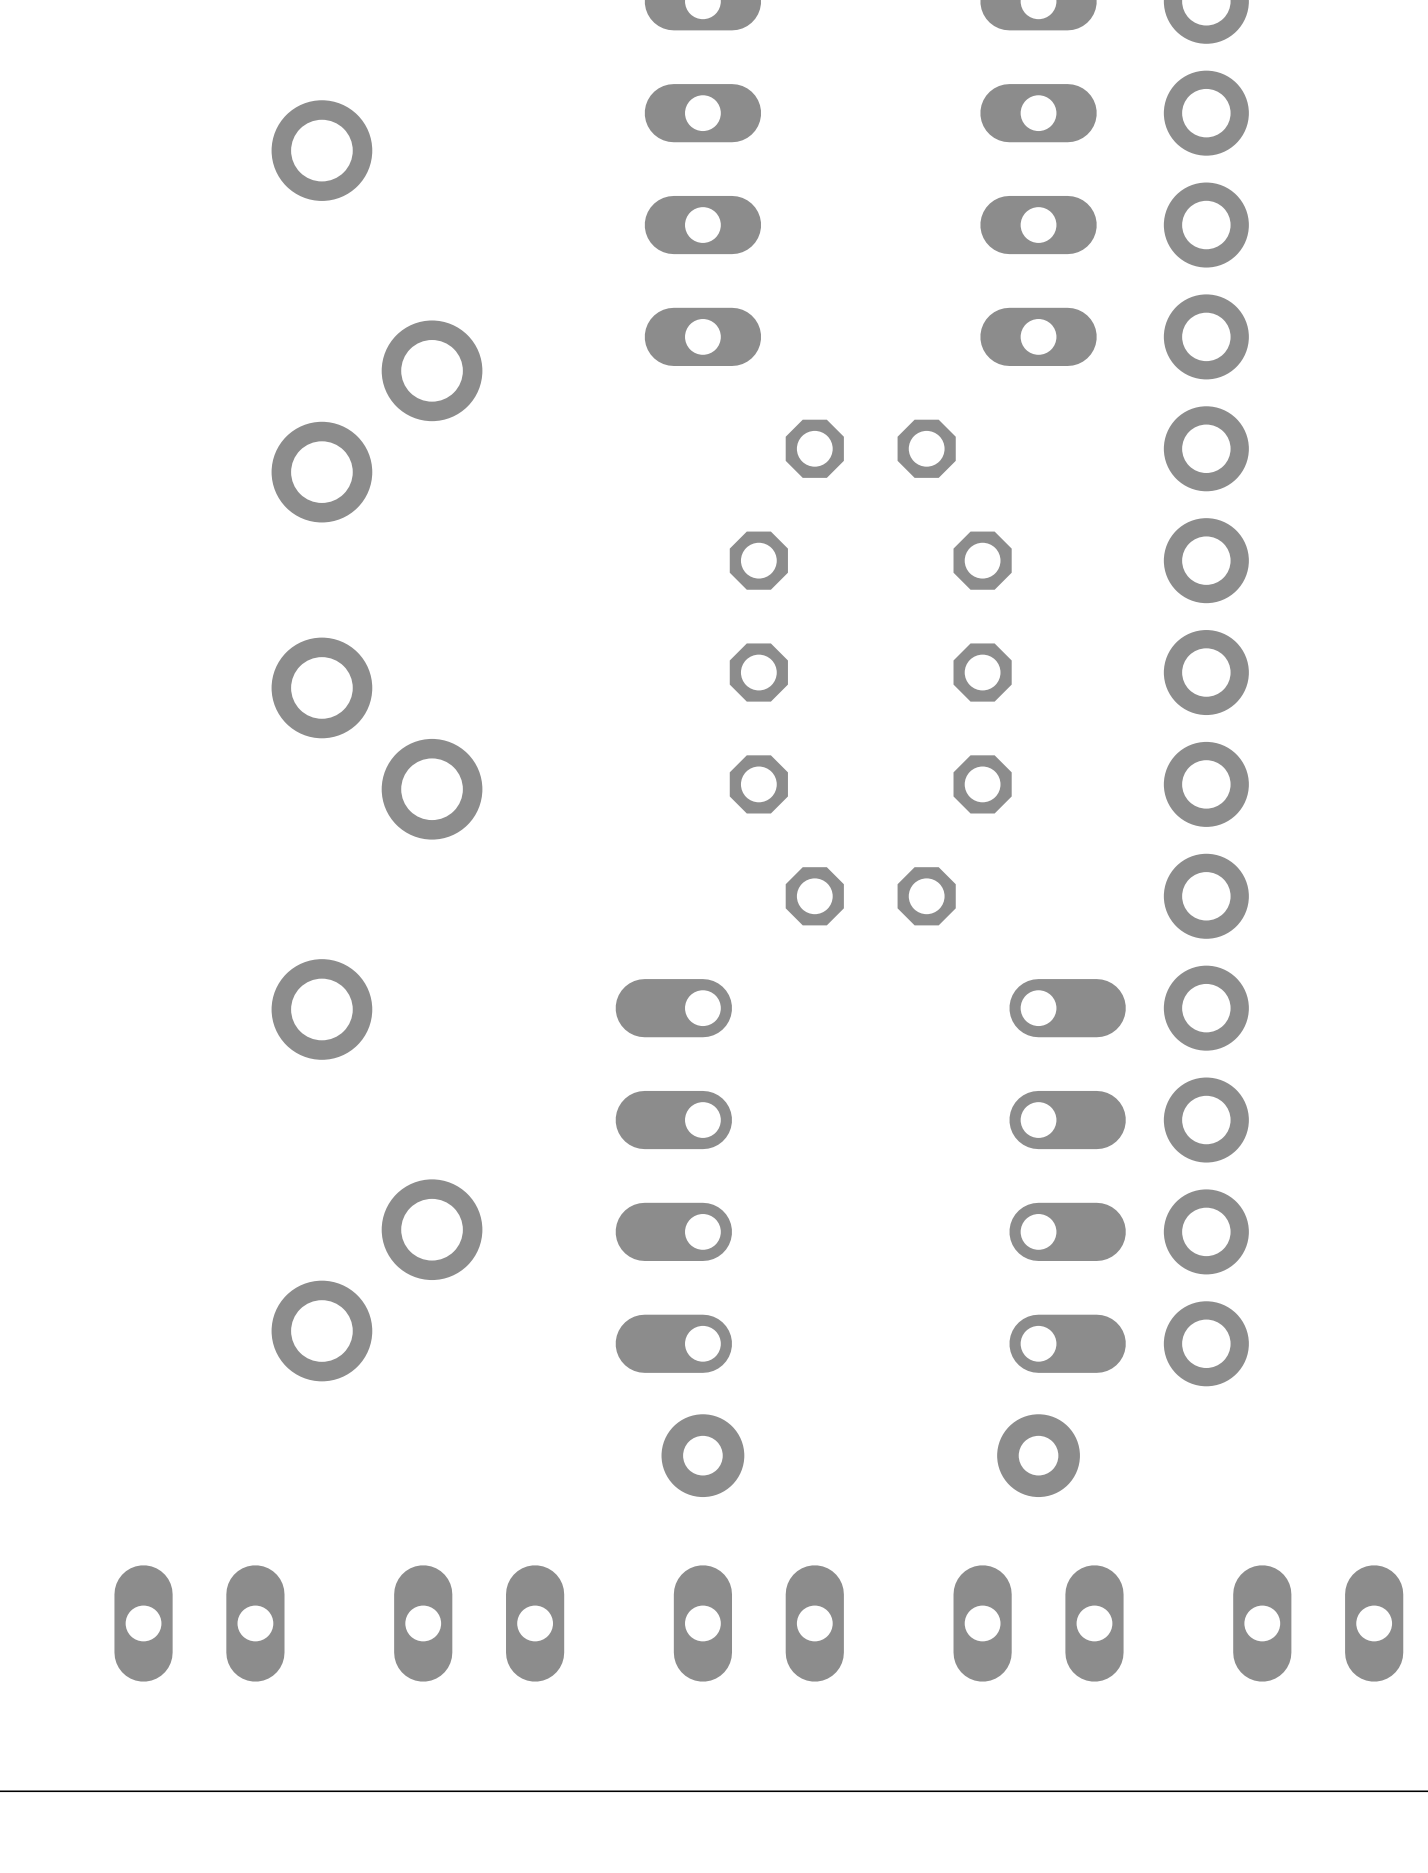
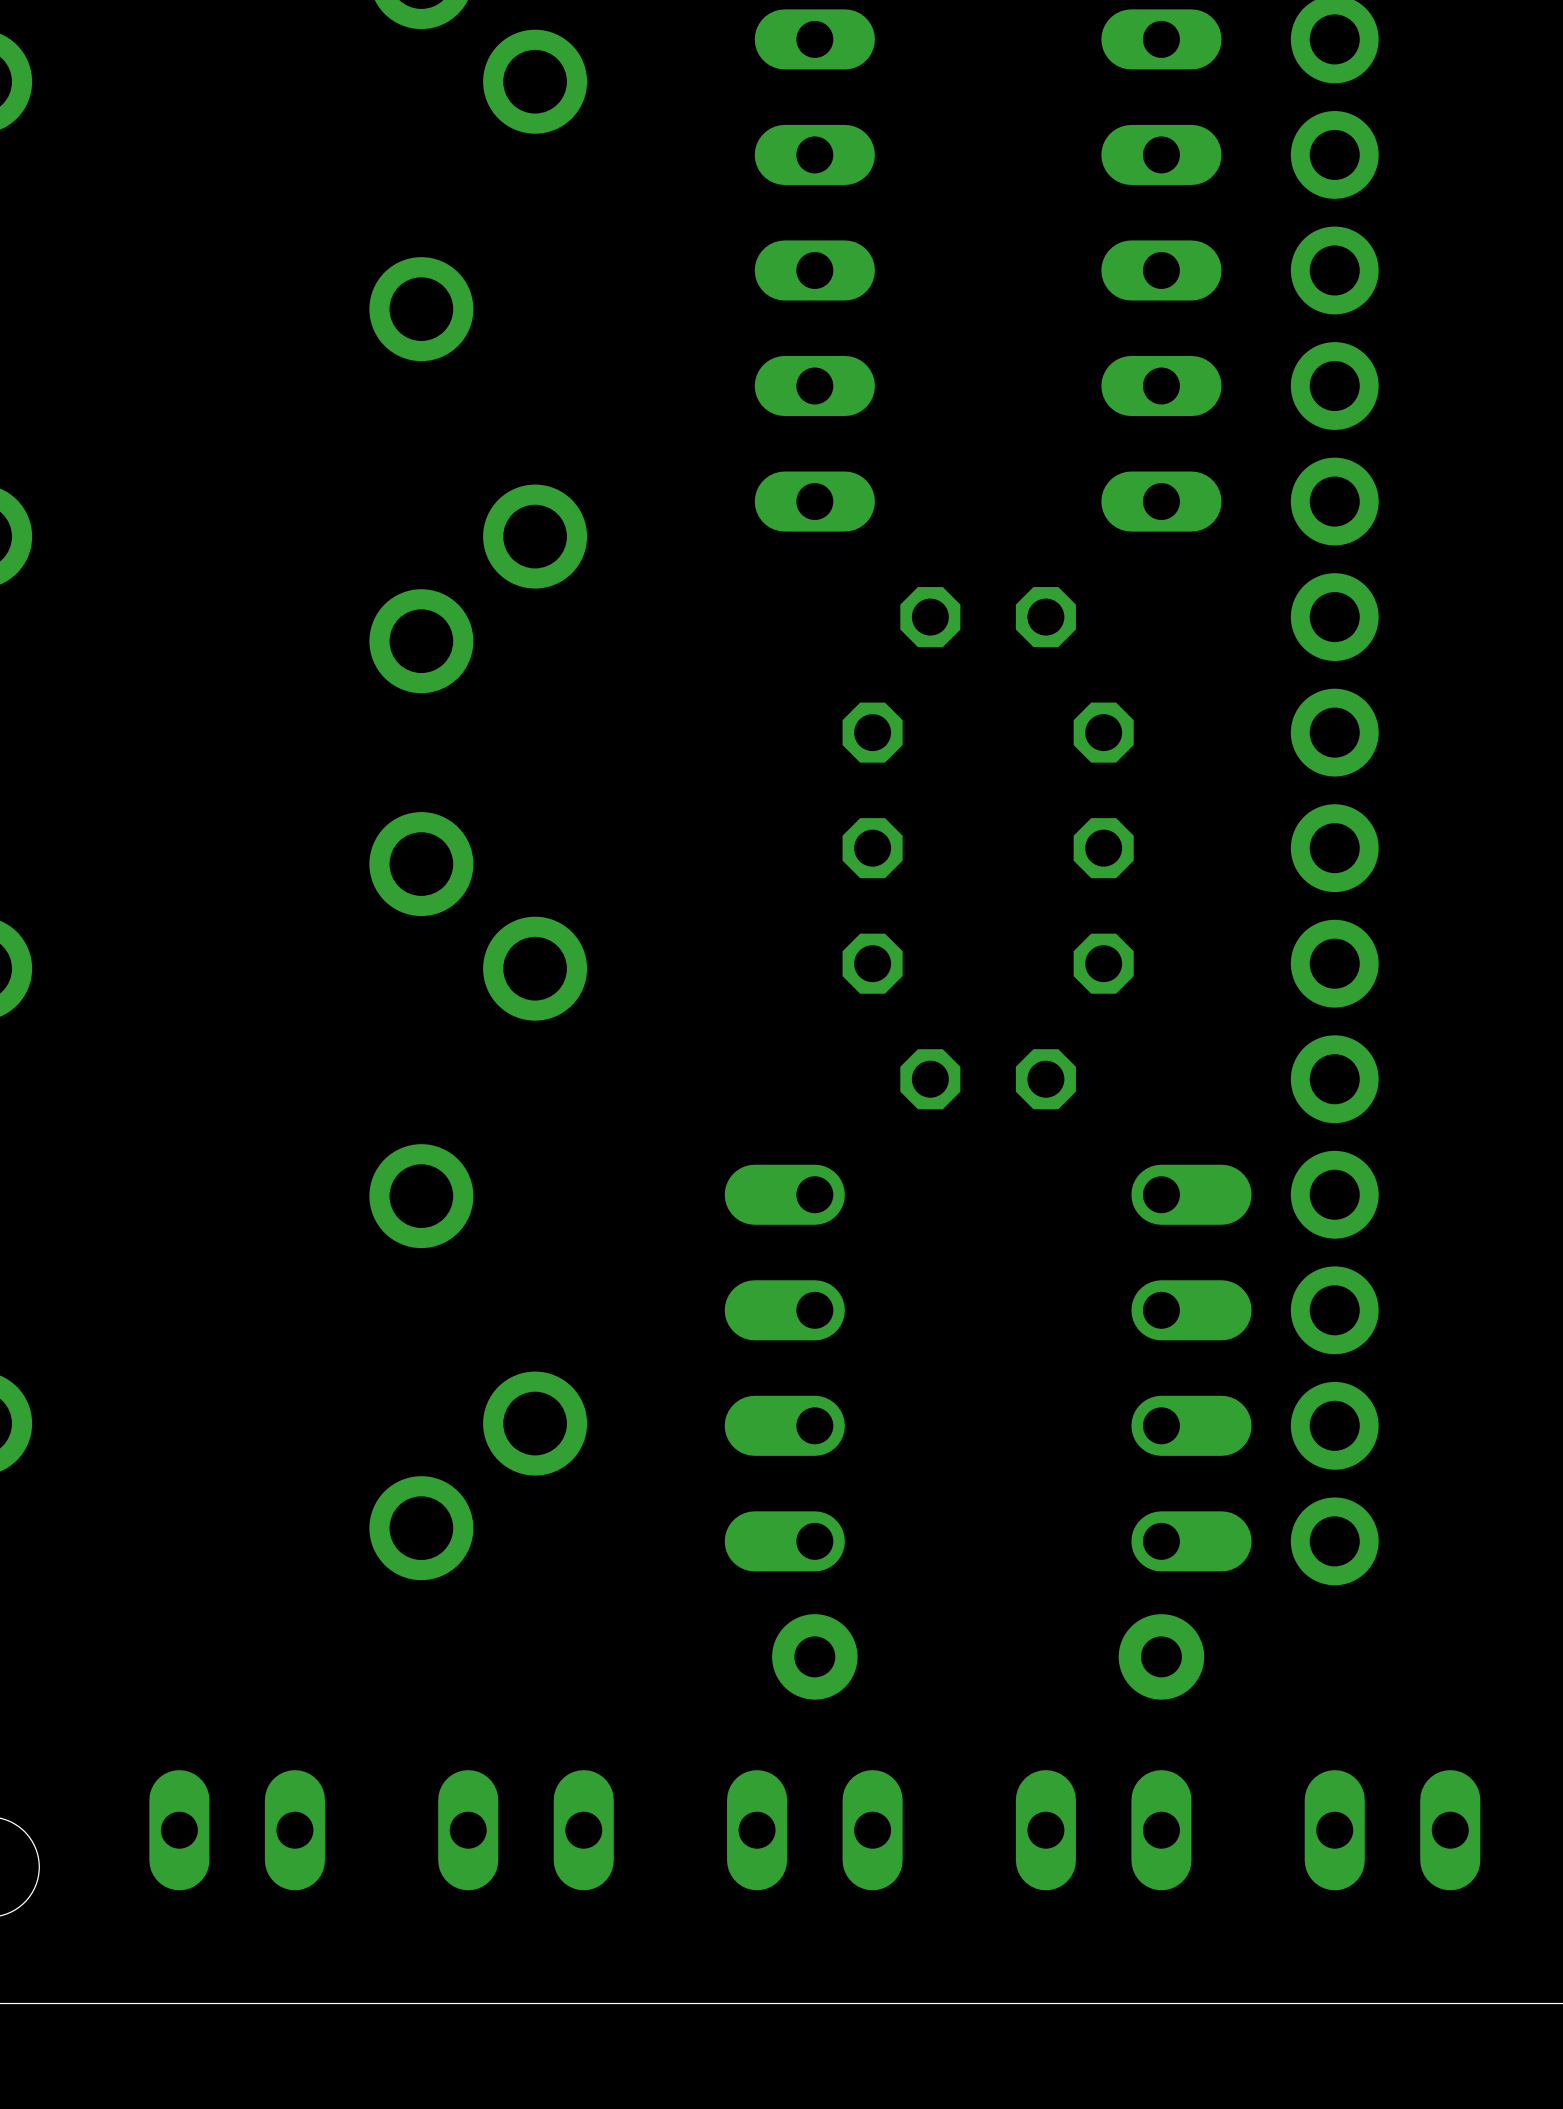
part position: (199, 1623) -> (237, 1830)
part position: (479, 1623) -> (525, 1830)
part position: (758, 1623) -> (814, 1830)
part position: (1038, 1623) -> (1103, 1830)
part position: (1318, 1623) -> (1392, 1830)

